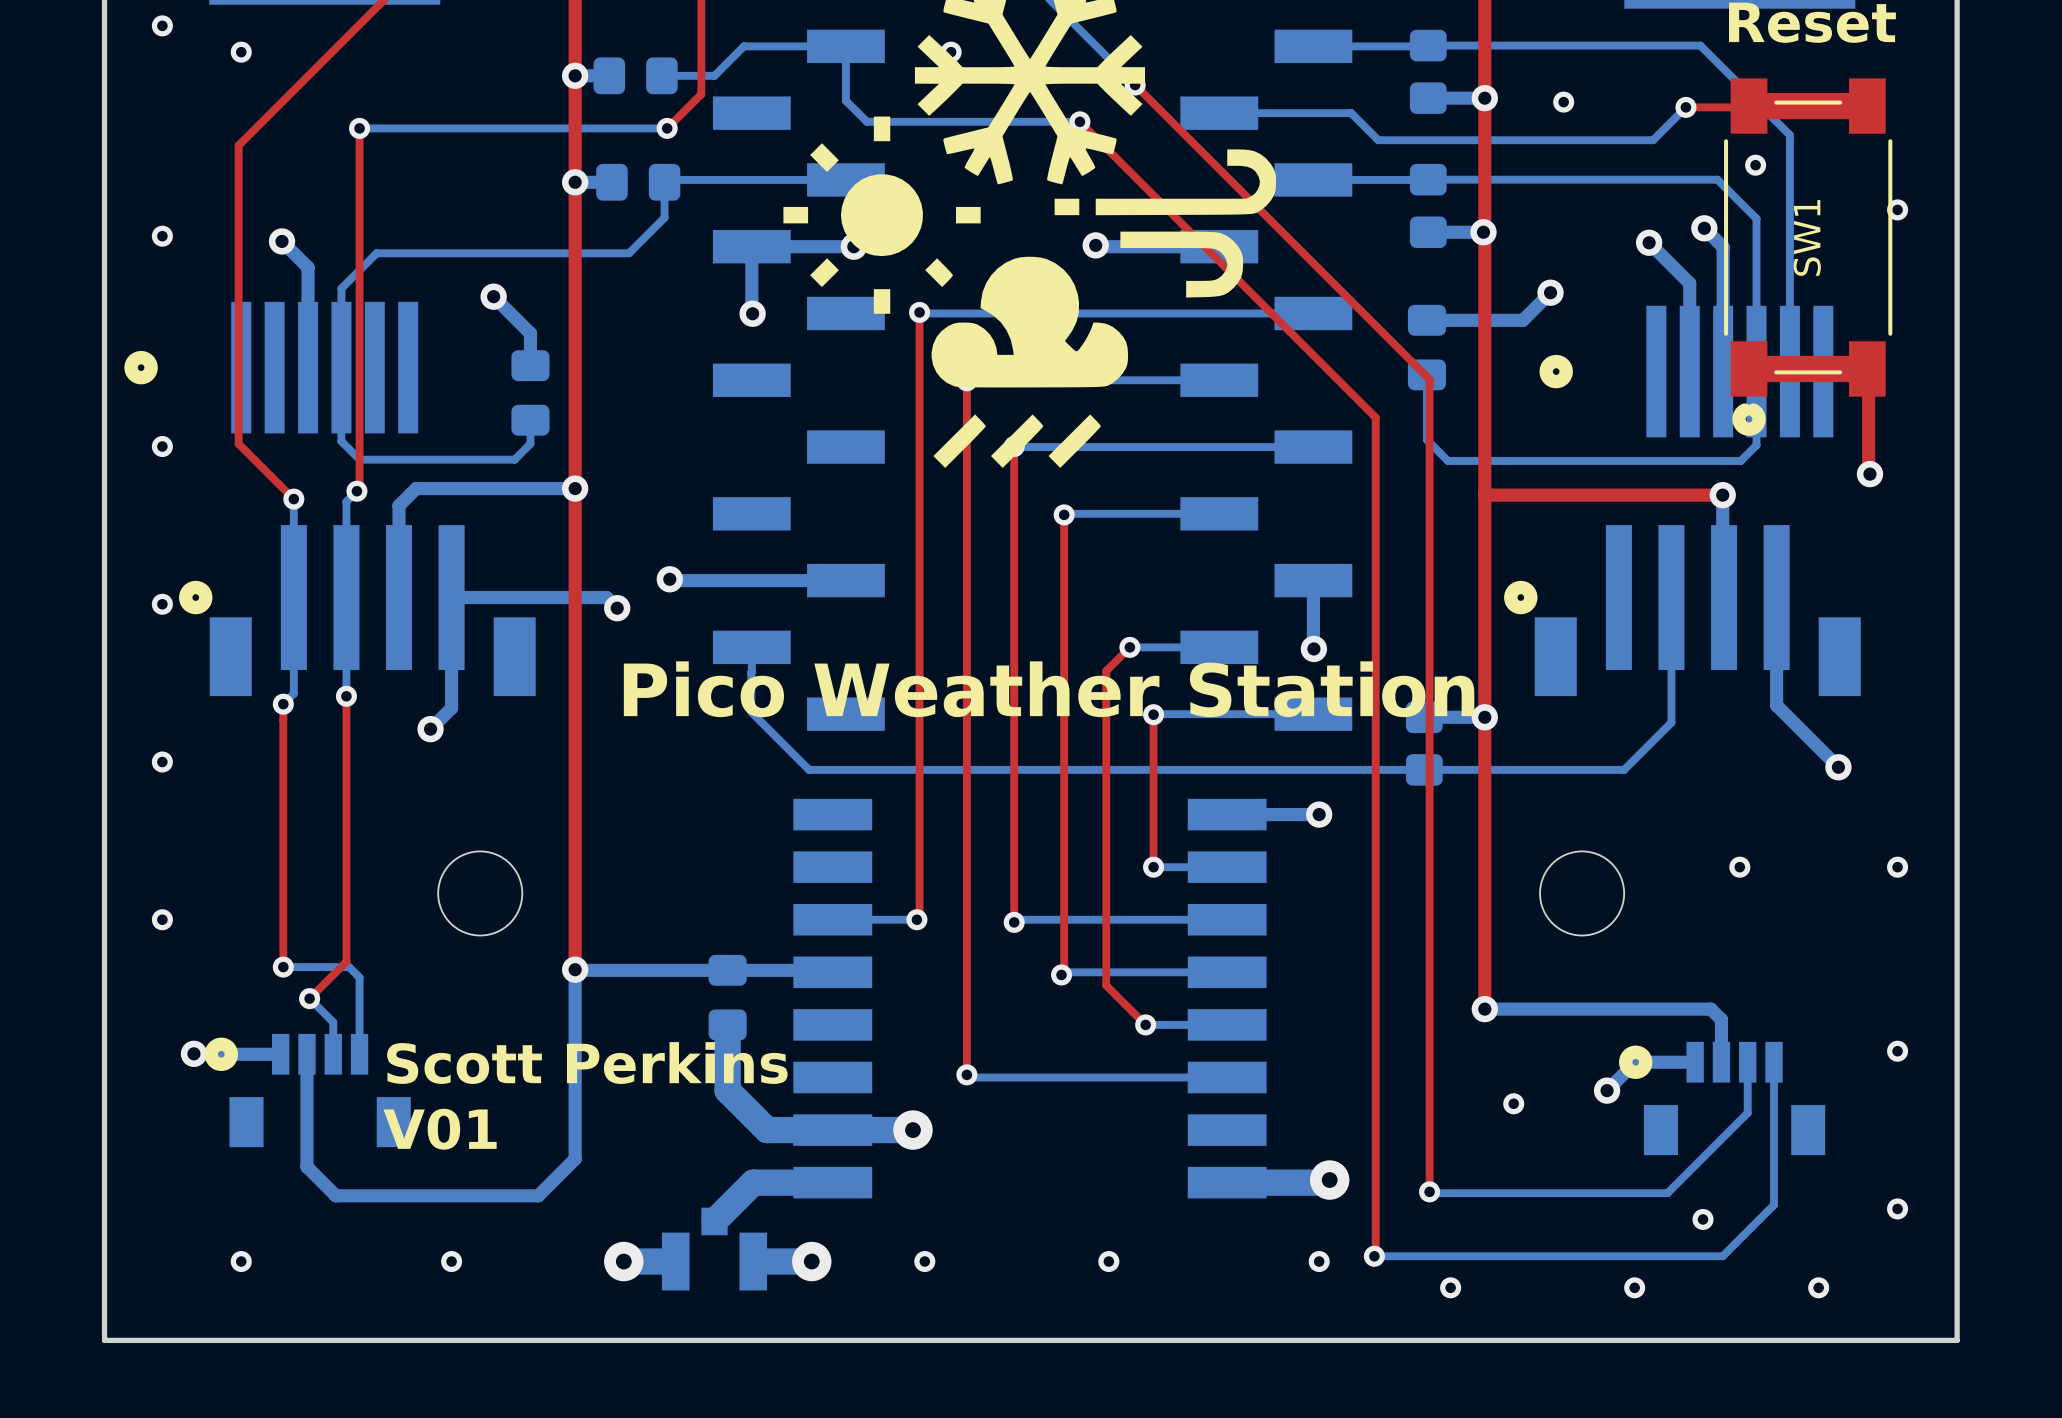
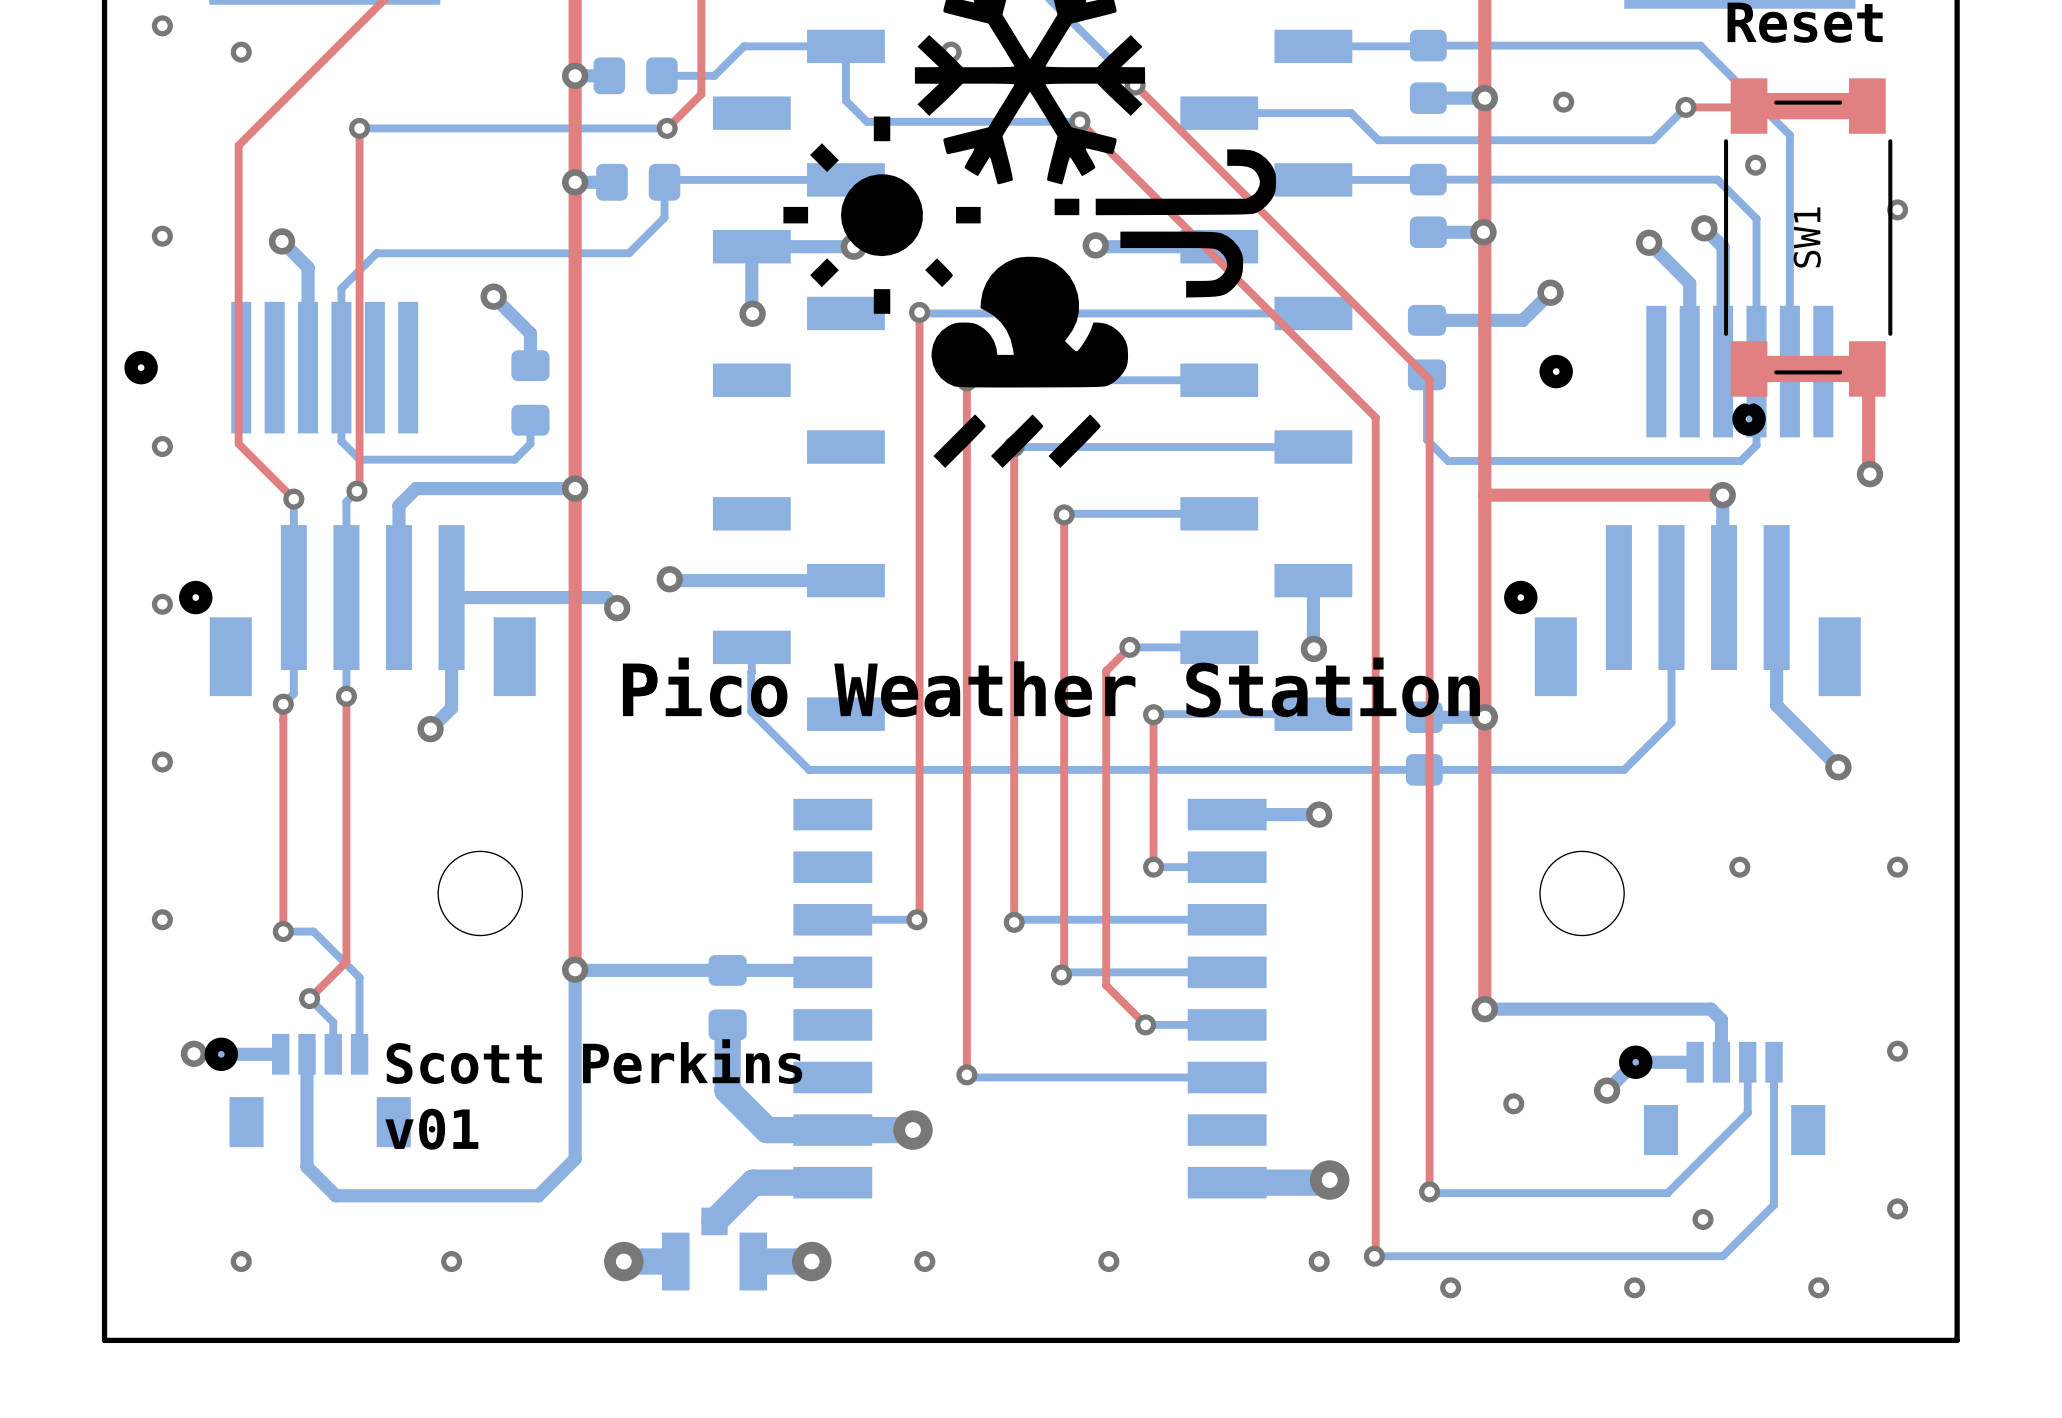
top track: (283, 931) (283, 967) -> none
bottom track: (283, 967) (349, 967) -> (283, 931) (313, 931) (349, 967)
via position: (283, 967) -> (283, 931)
text: V01 (440, 1129) -> v01 (431, 1129)

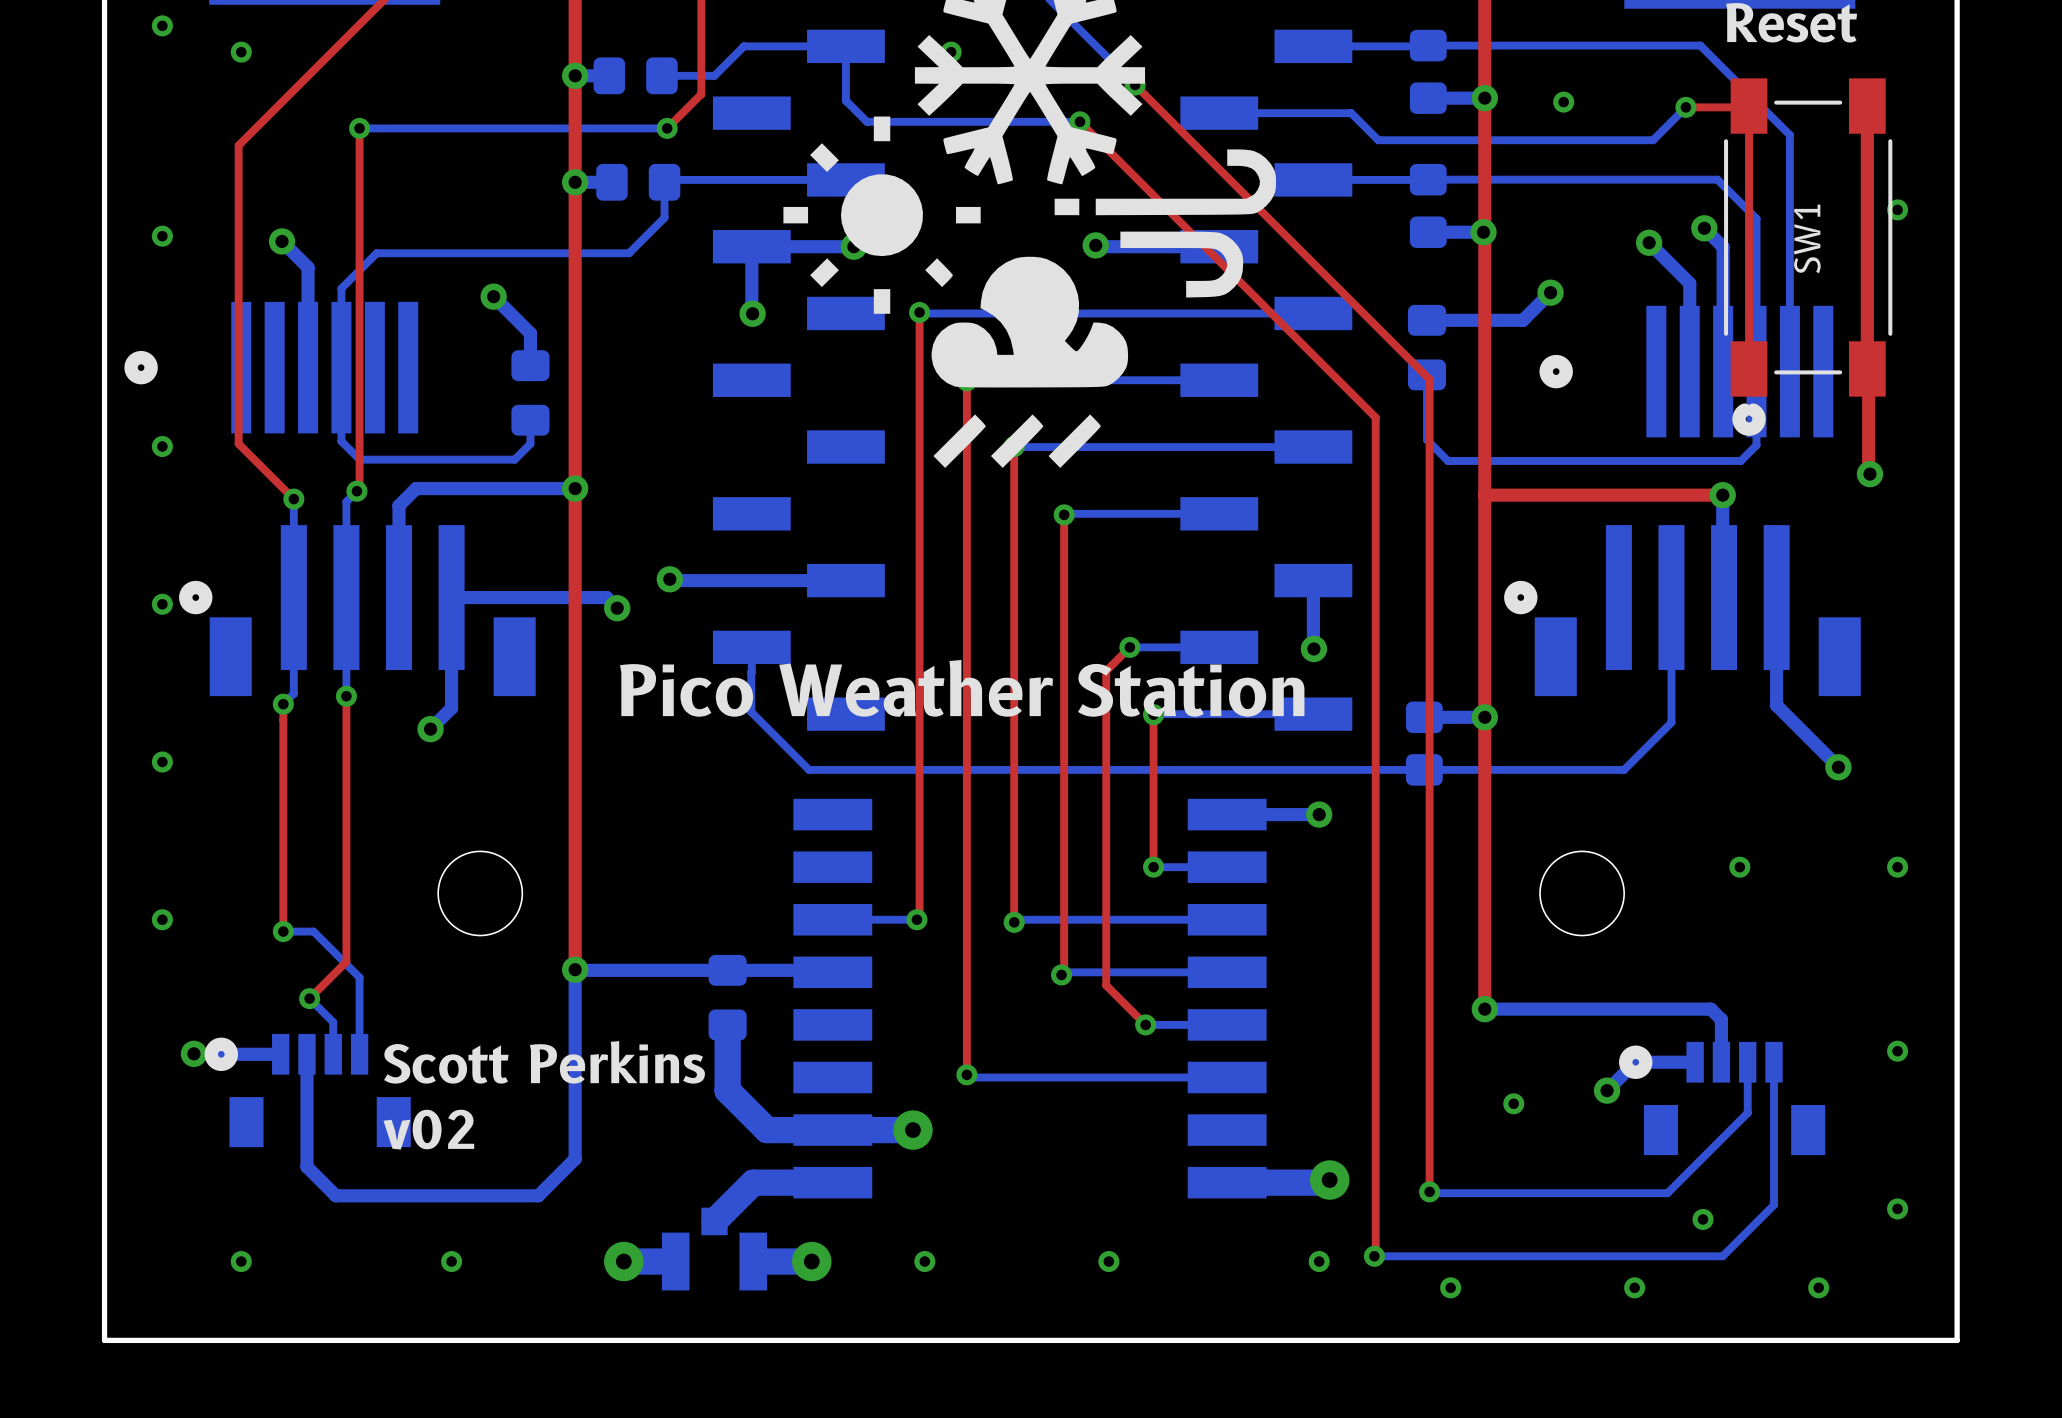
top track: (1749, 106) (1867, 106) -> (1749, 106) (1749, 368)
via: (1755, 165) -> none
top track: (1749, 368) (1867, 368) -> (1867, 106) (1867, 368)
text: v01 (431, 1129) -> v02 (428, 1129)

